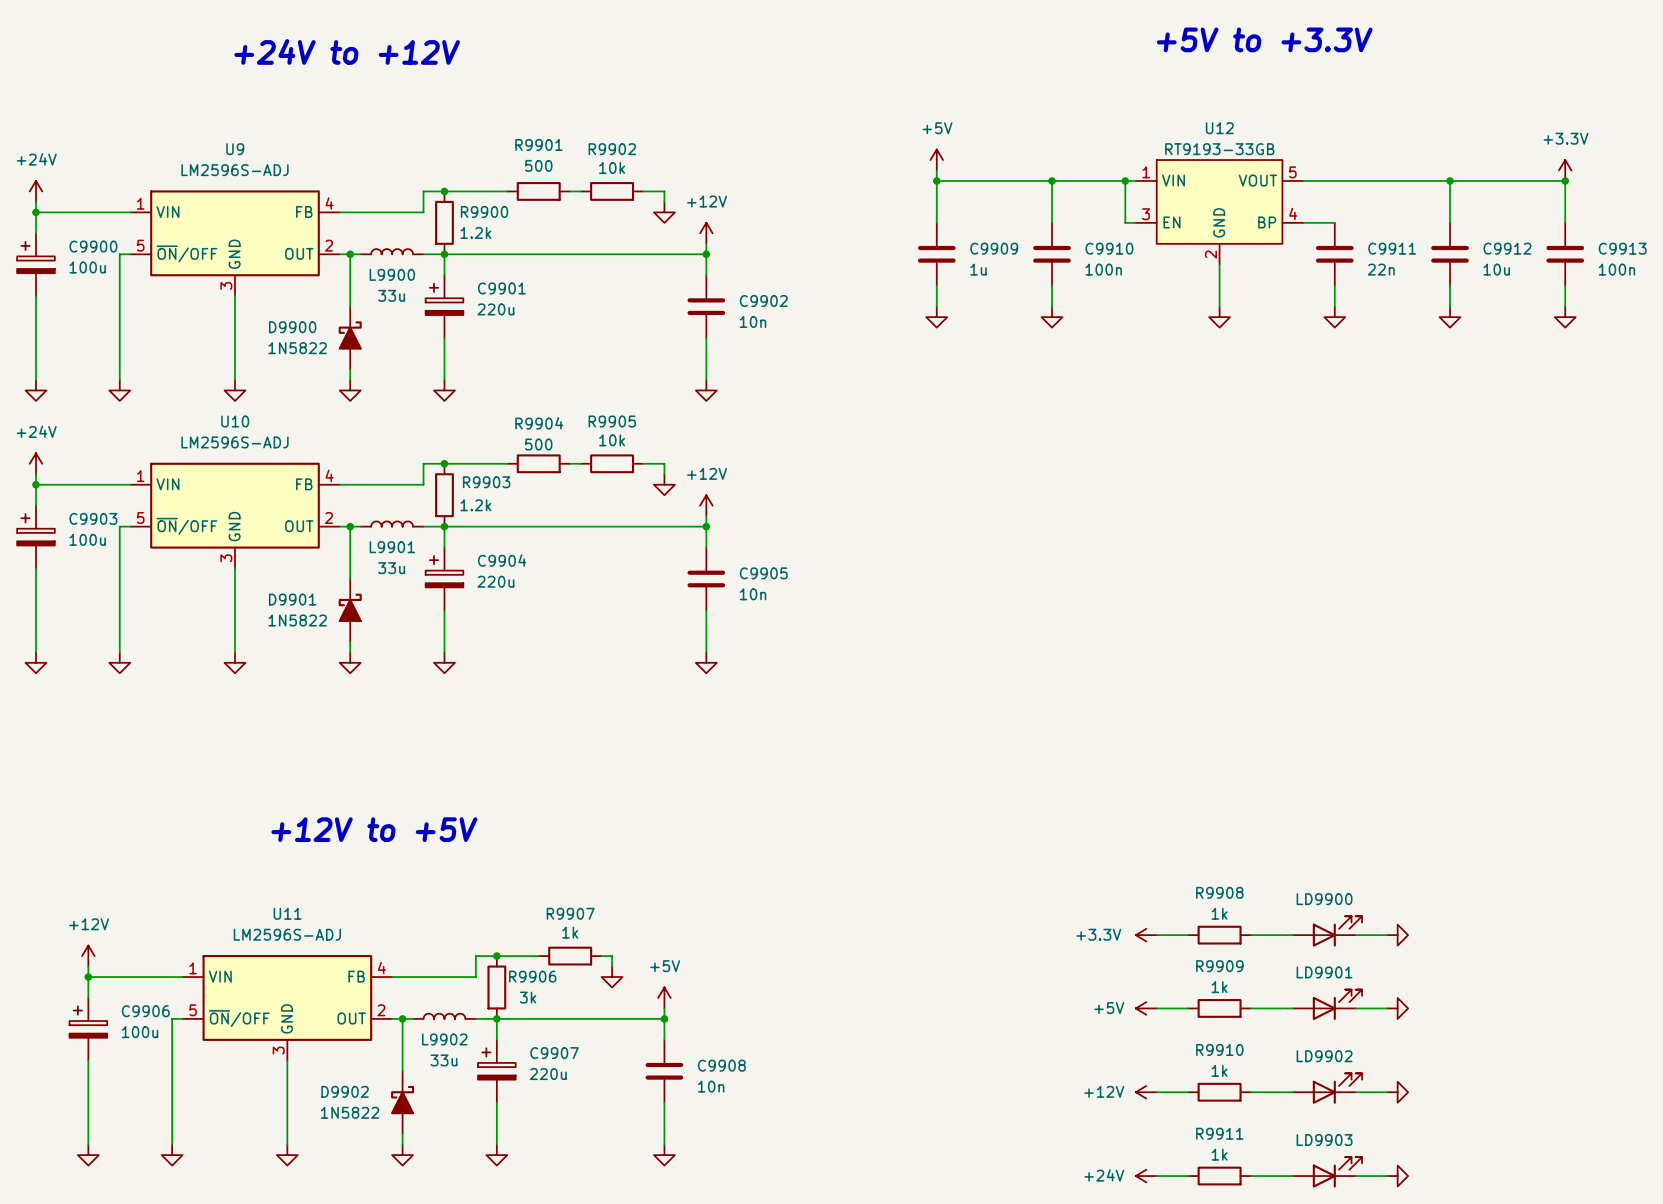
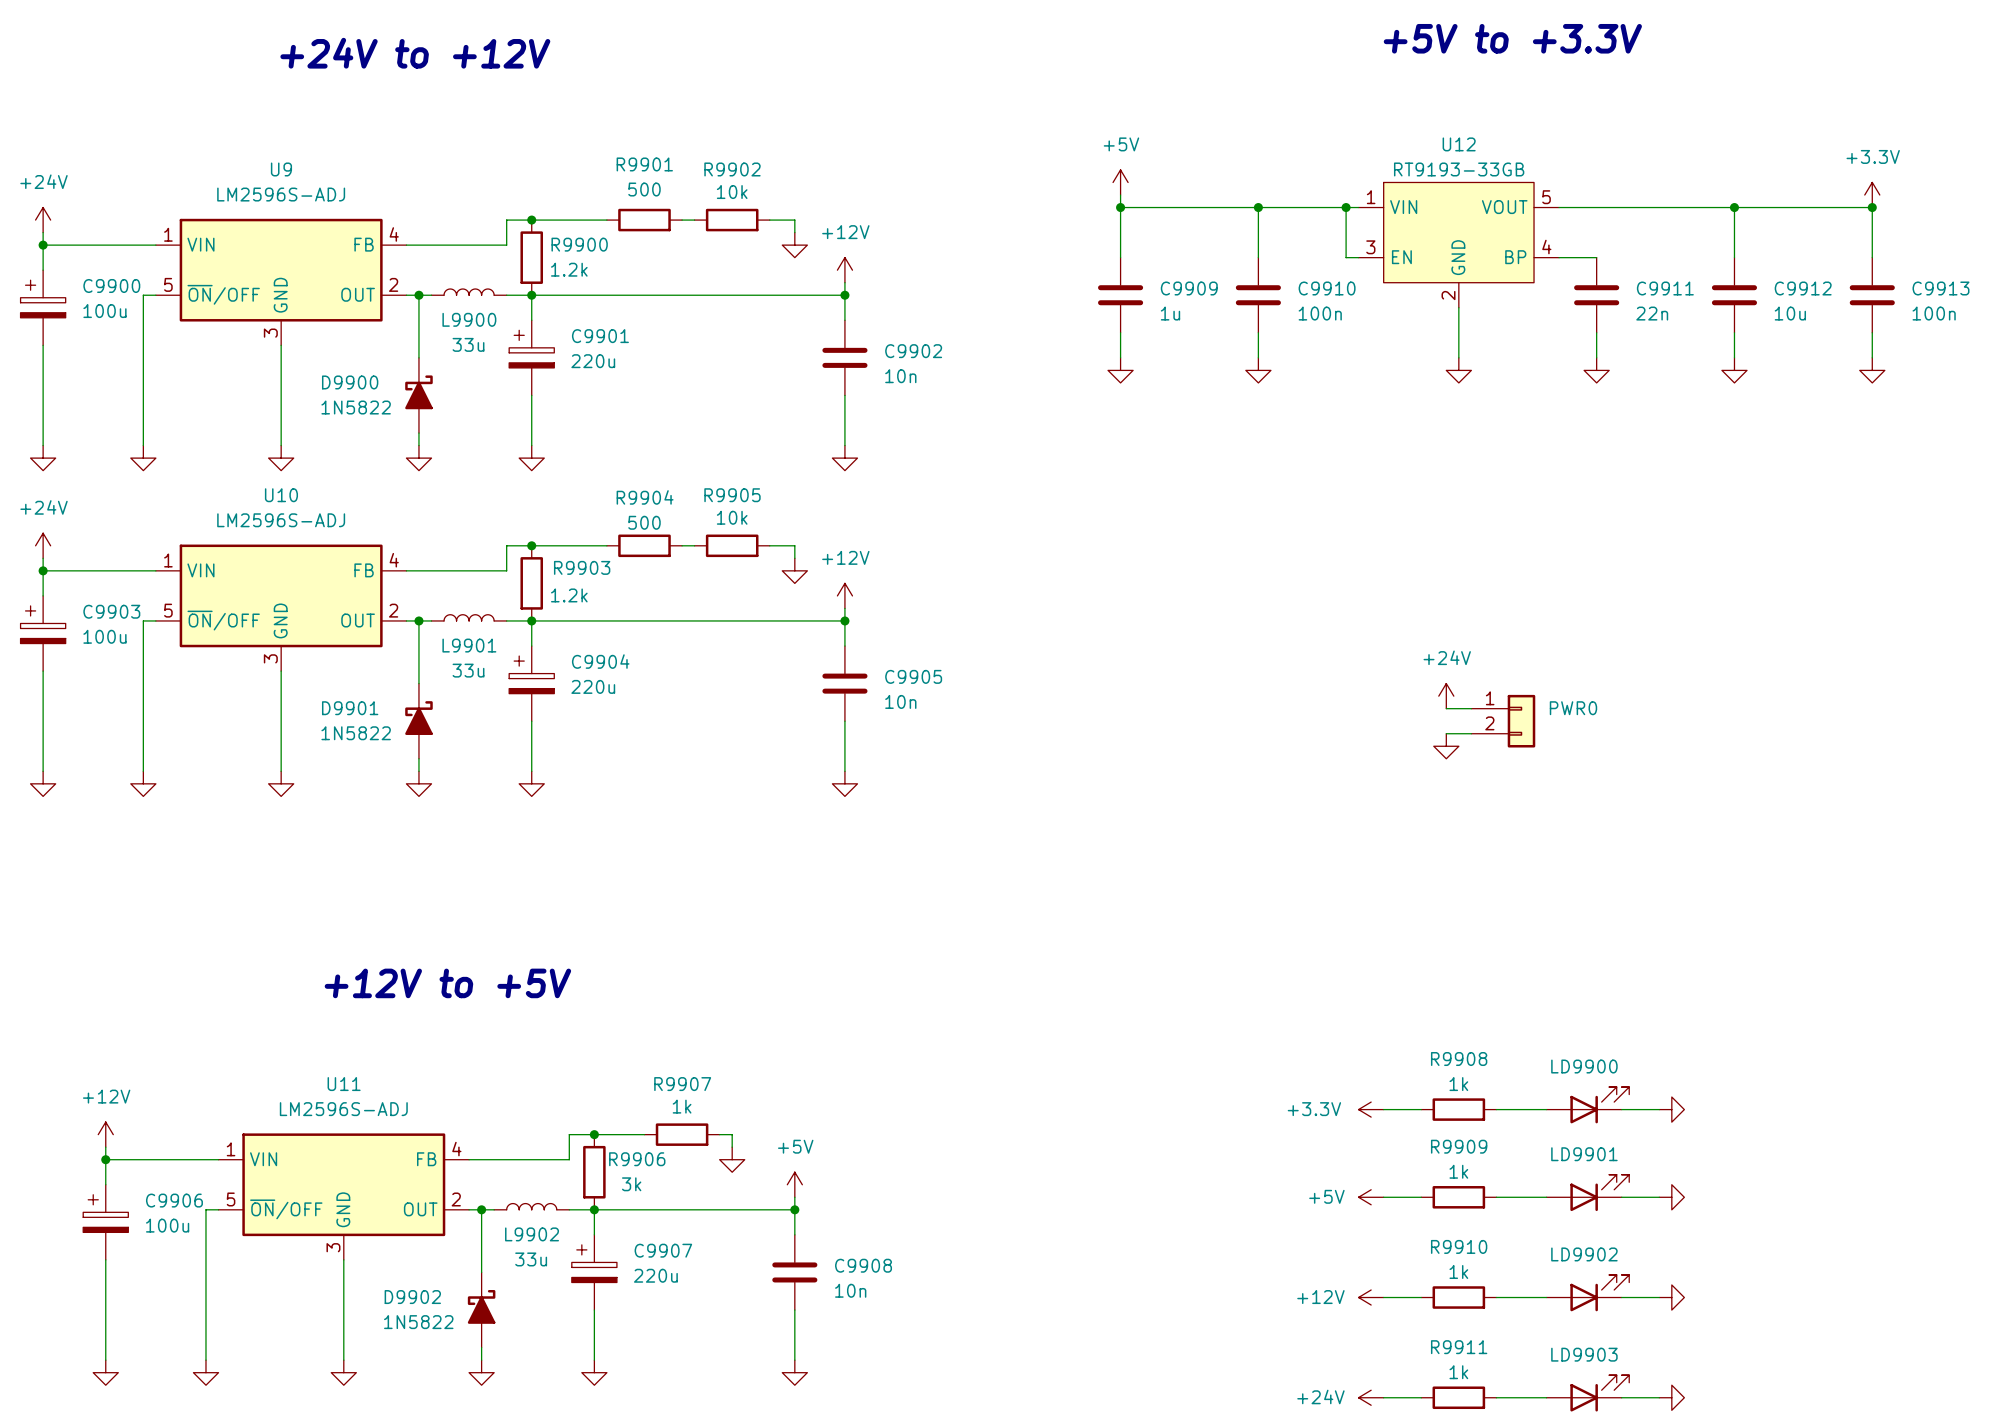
power symbol: none -> +24V (1446, 696)
wire: none -> (1446, 708) (1471, 708)
PWR0: none -> (1503, 721)
wire: none -> (1446, 733) (1471, 733)
power symbol: none -> (1446, 746)

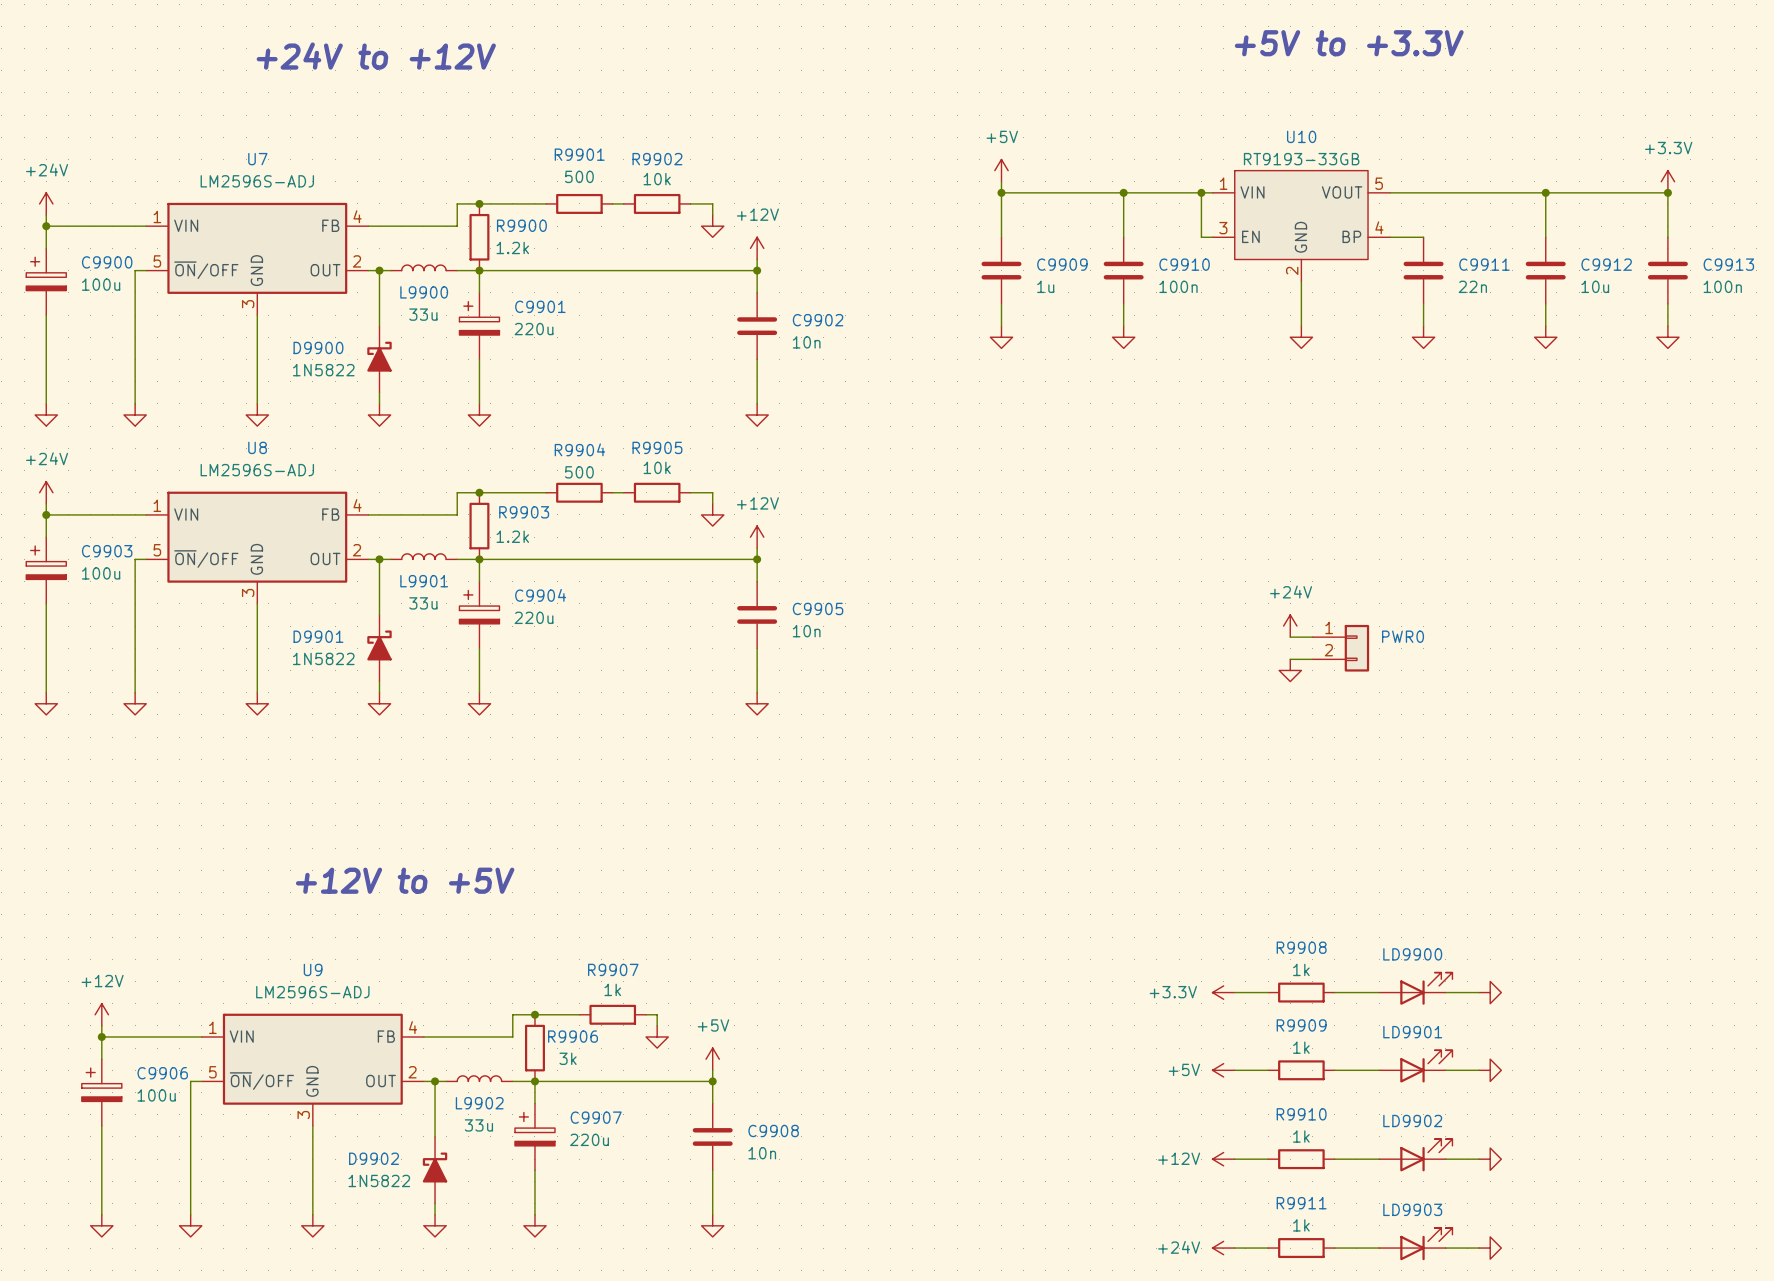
U12 name: U12 (1459, 144) -> U10 (1301, 136)
U9 name: U9 (281, 169) -> U7 (257, 159)
U10 name: U10 (281, 495) -> U8 (257, 447)
U11 name: U11 (344, 1084) -> U9 (313, 969)

